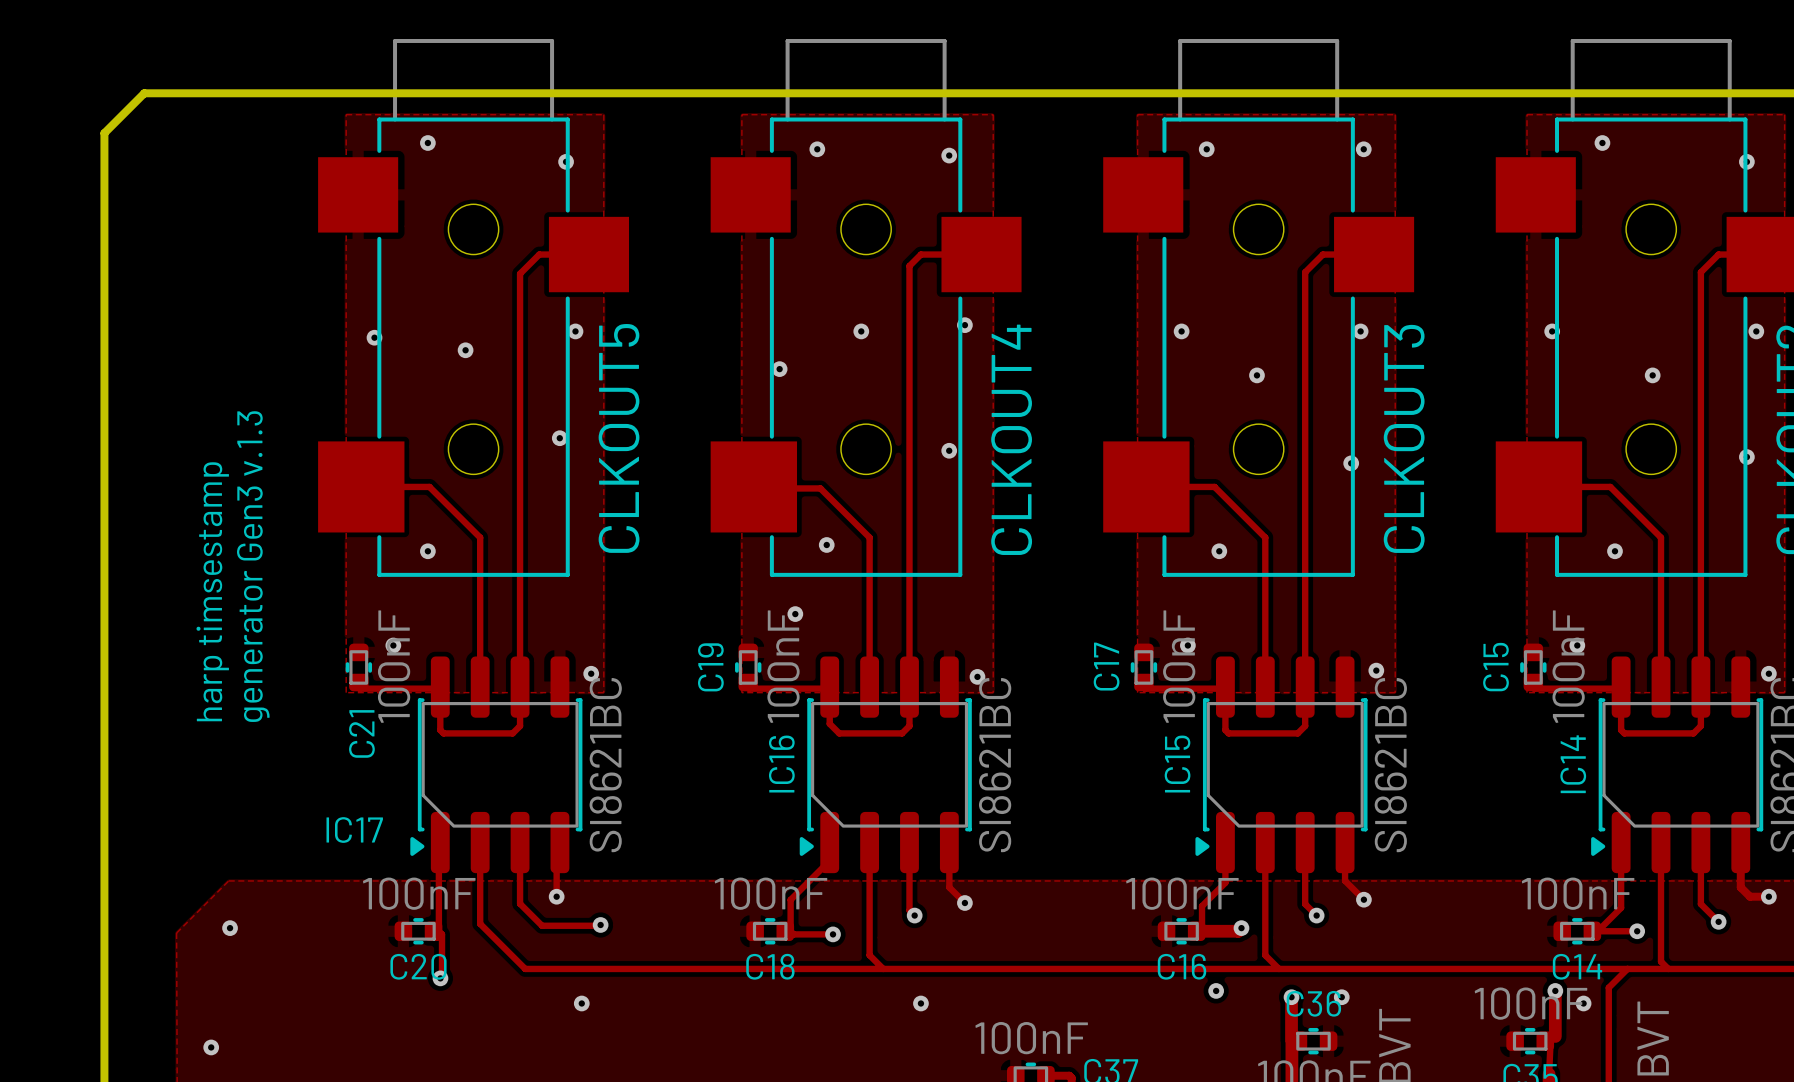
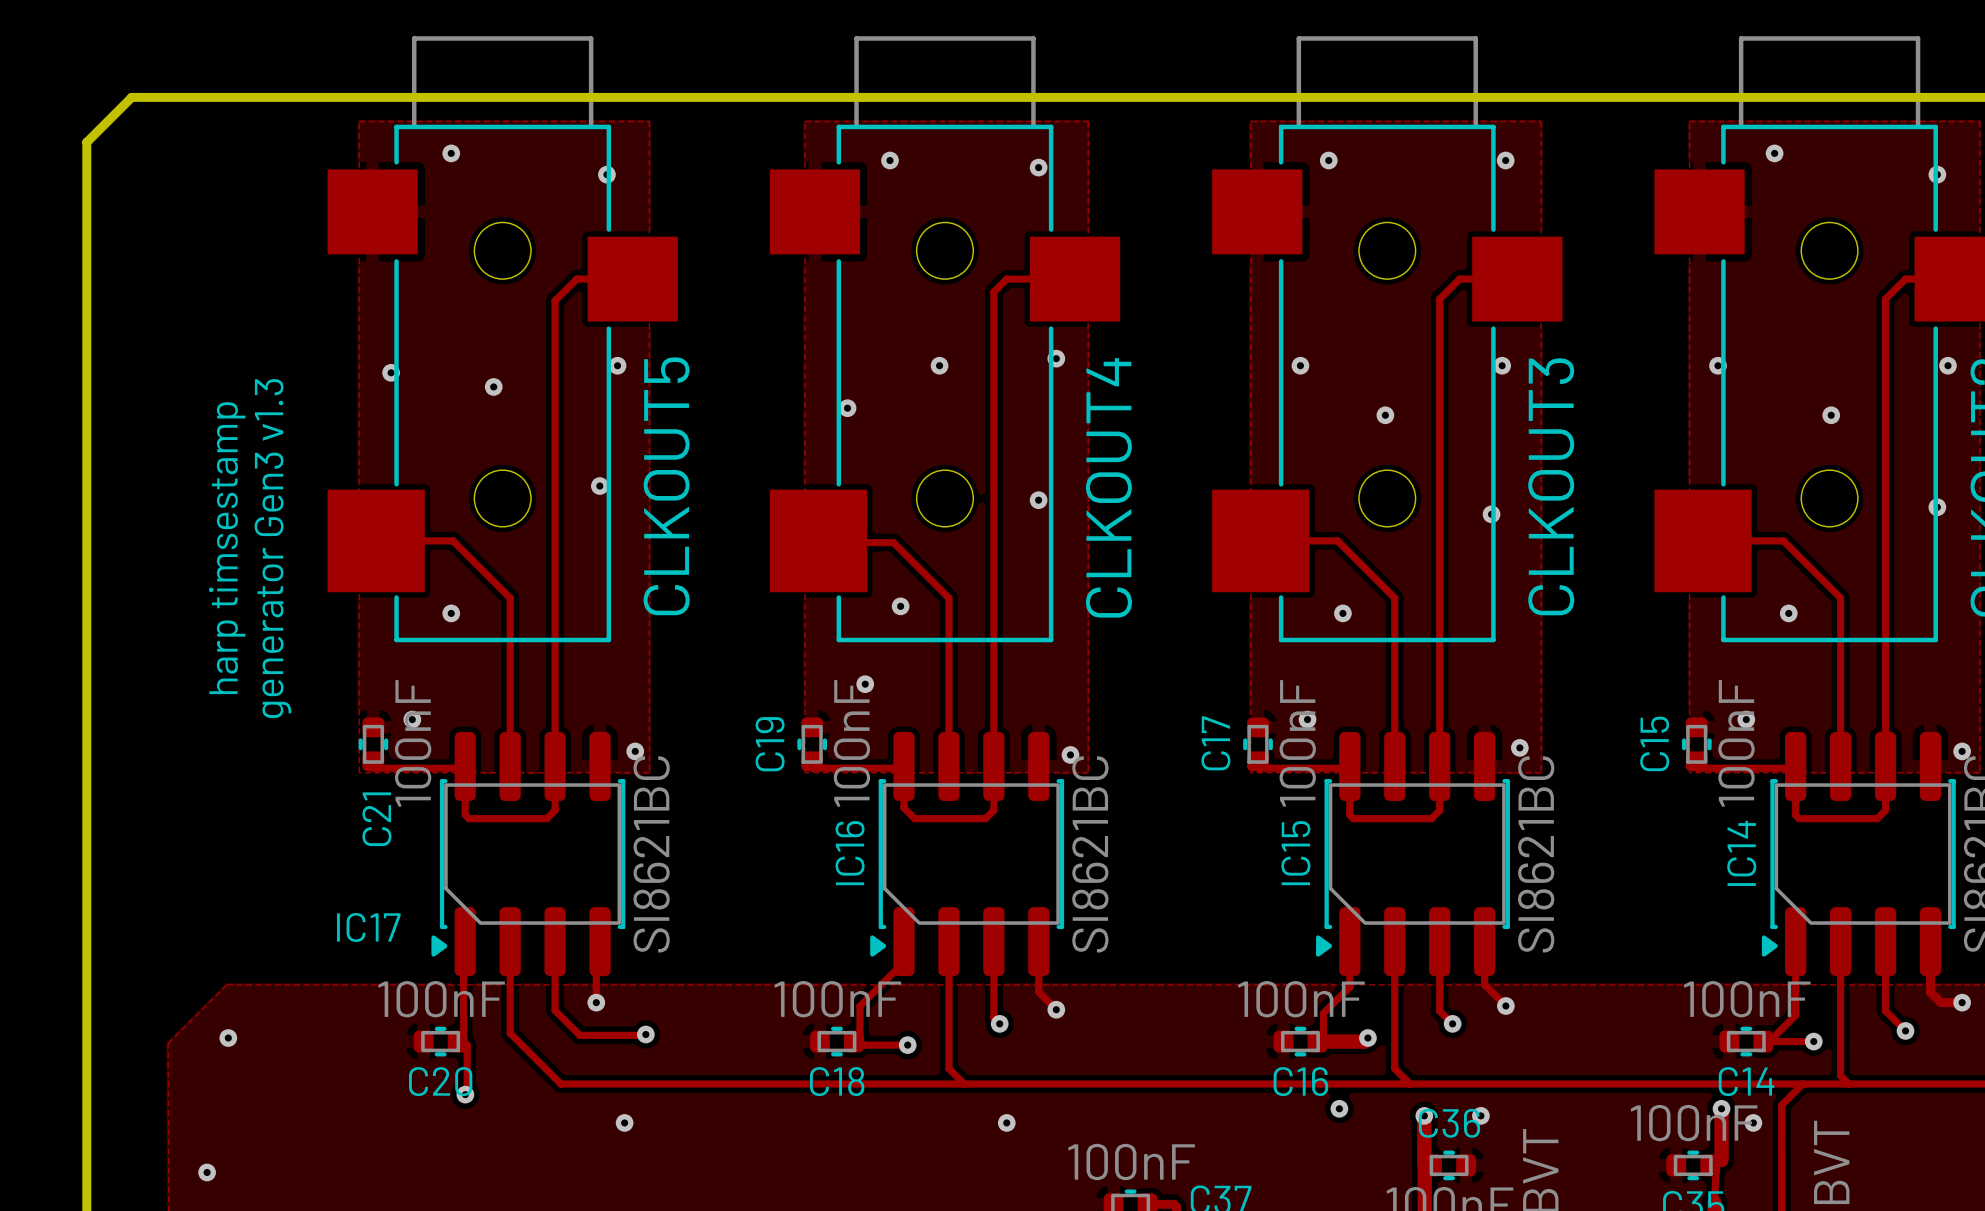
text: generator Gen3 v.1.3 (253, 566) -> generator Gen3 v1.3 (272, 548)
text position: harp timsestamp (212, 591) -> harp timsestamp (227, 548)

